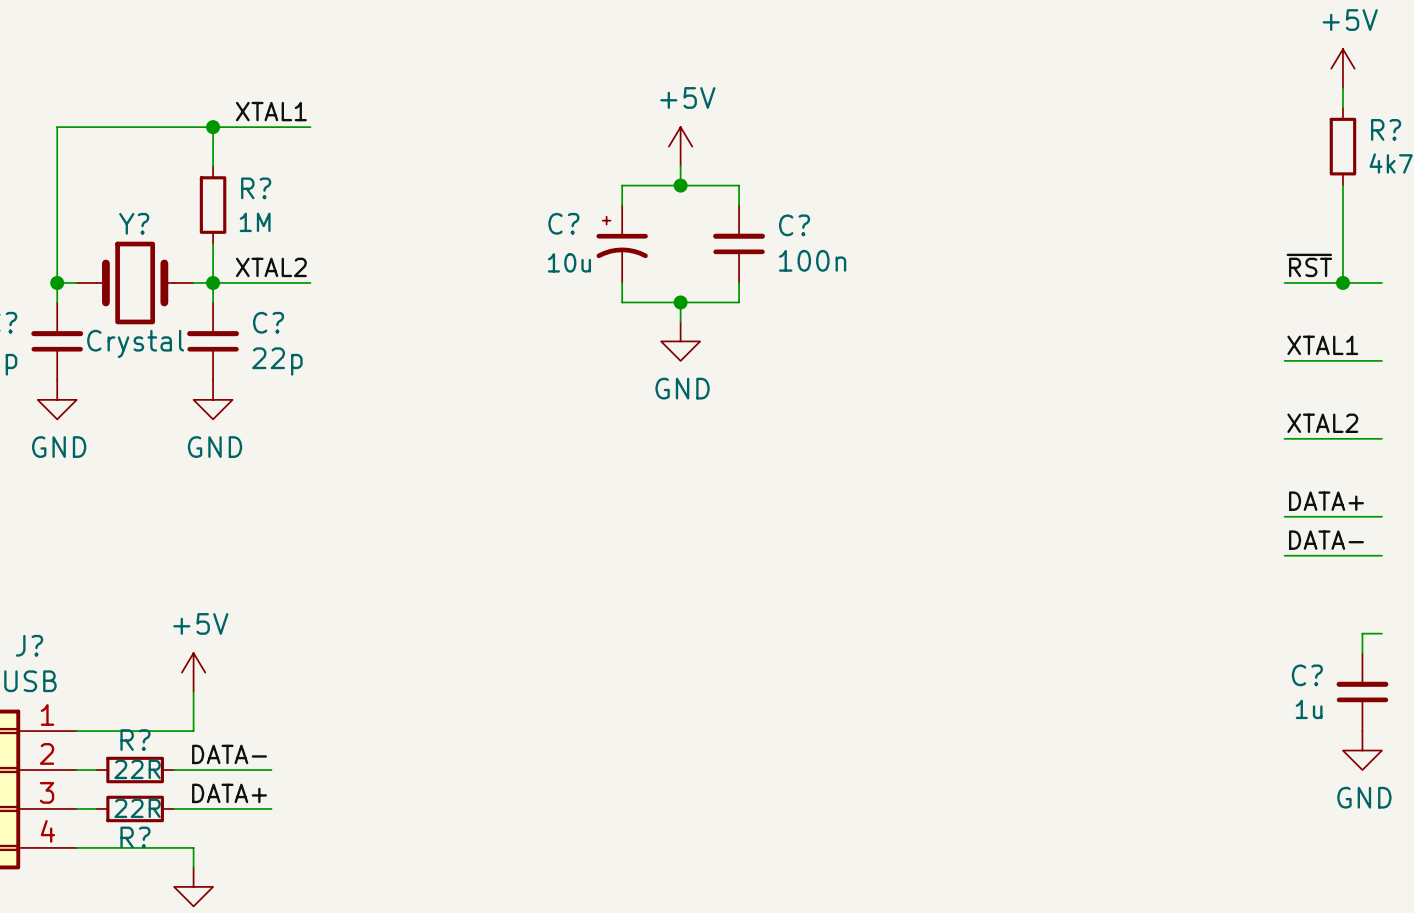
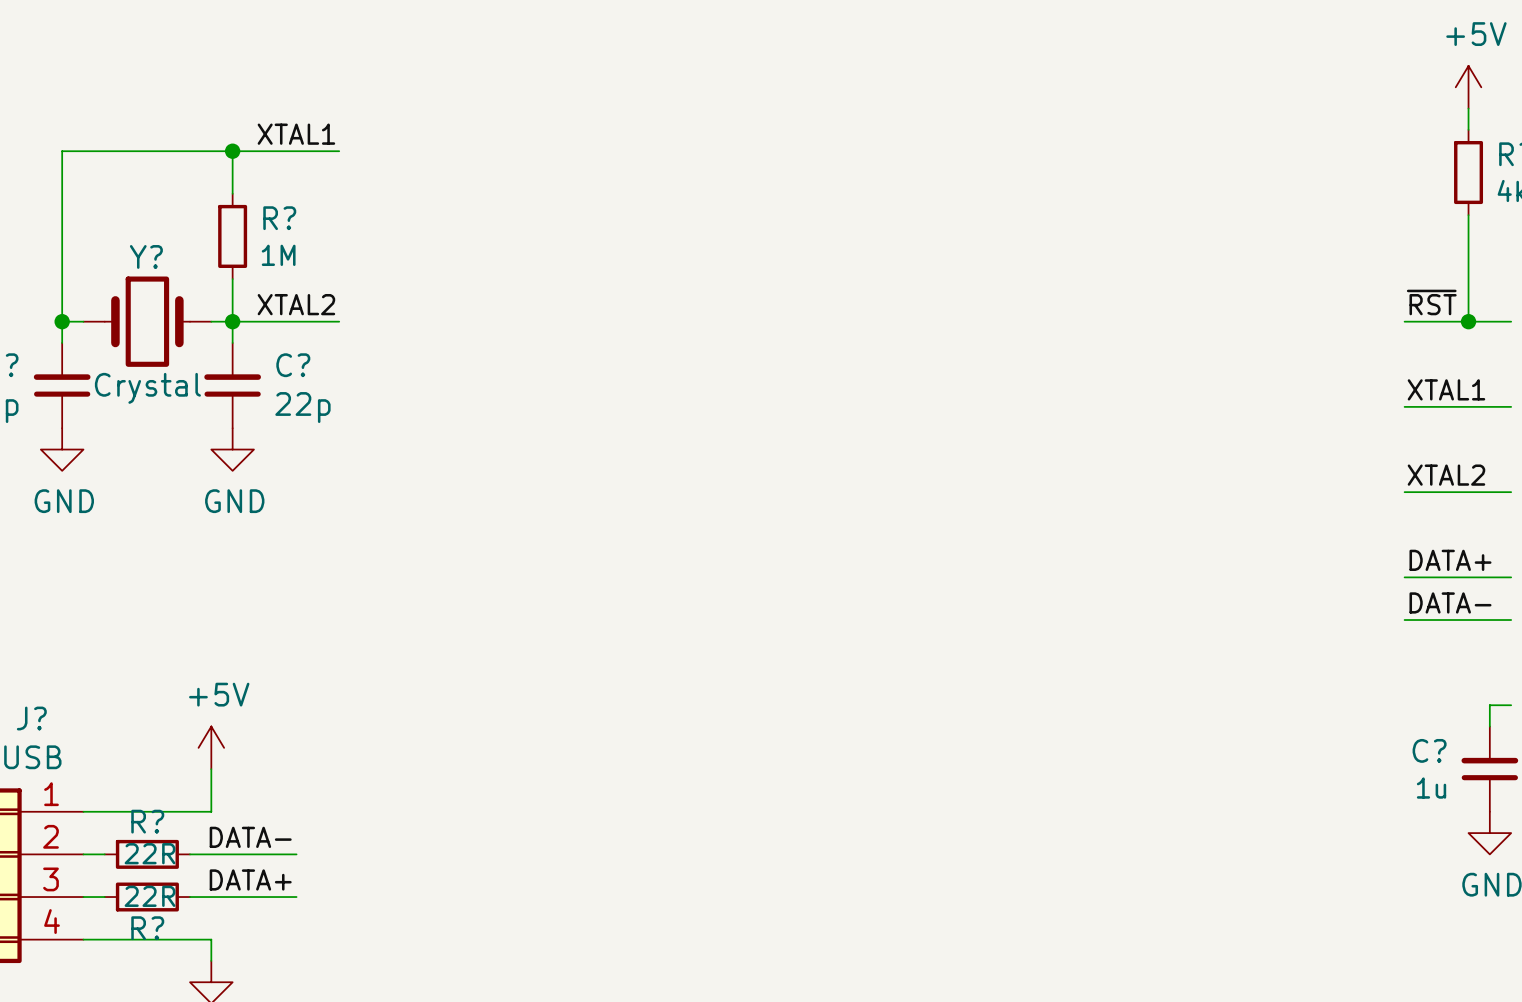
power symbol: +5V (680, 146) -> none
wire: (680, 166) (680, 185) -> none
junction: (680, 185) -> none
wire: (622, 205) (622, 185) (739, 185) (739, 205) -> none
C?: 10u (622, 244) -> none
C?: 100n (739, 244) -> none
wire: (622, 282) (622, 302) (739, 302) (739, 282) -> none
wire: (680, 302) (680, 321) -> none
junction: (680, 302) -> none
power symbol: GND (680, 341) -> none

